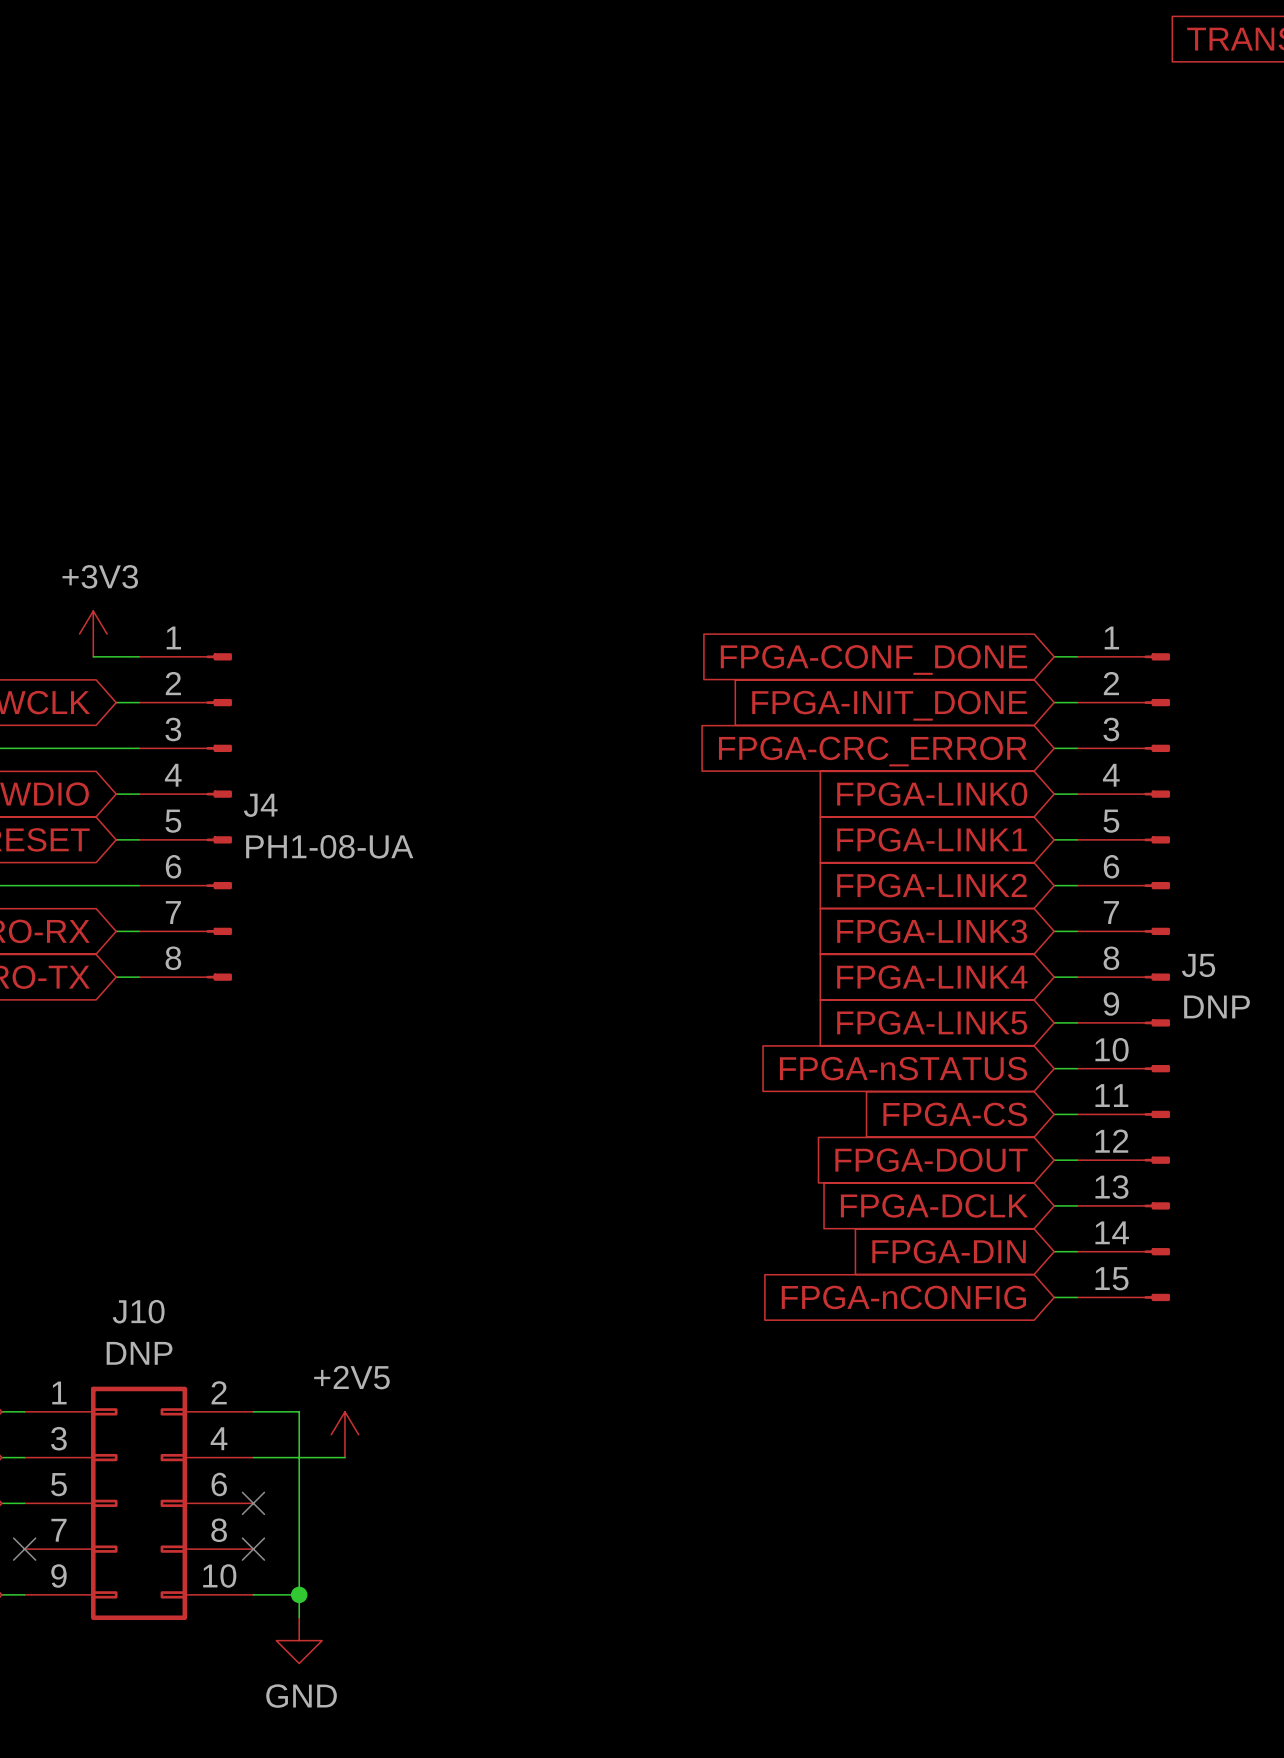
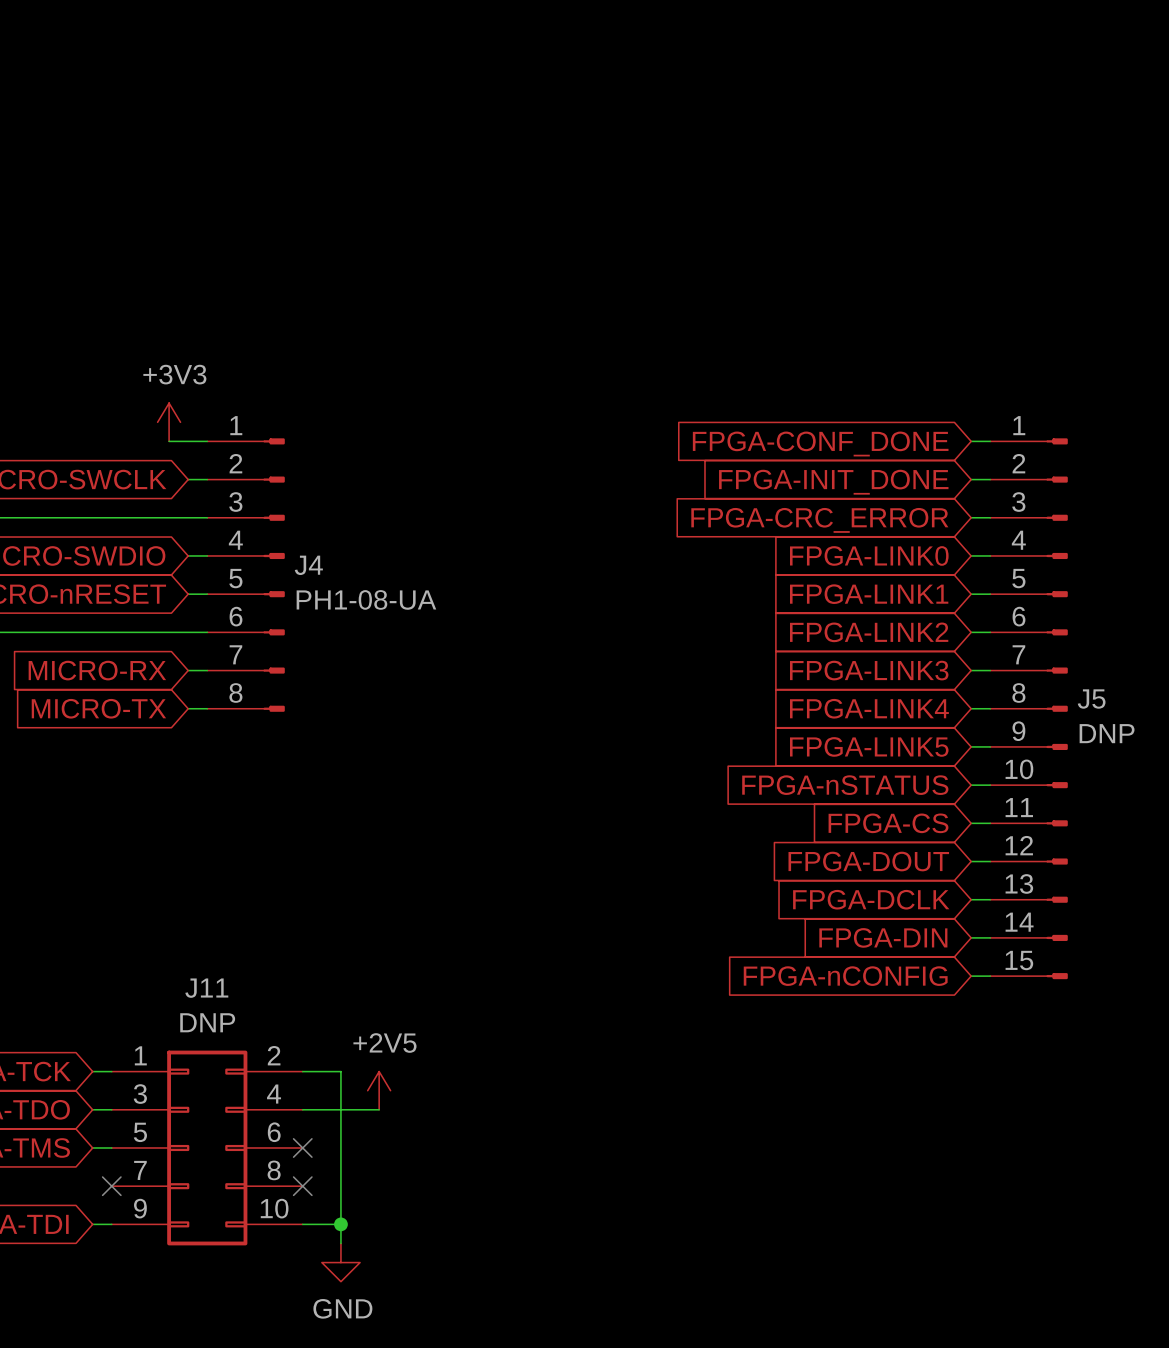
J10 name: J10 (138, 1311) -> J11 (206, 988)

